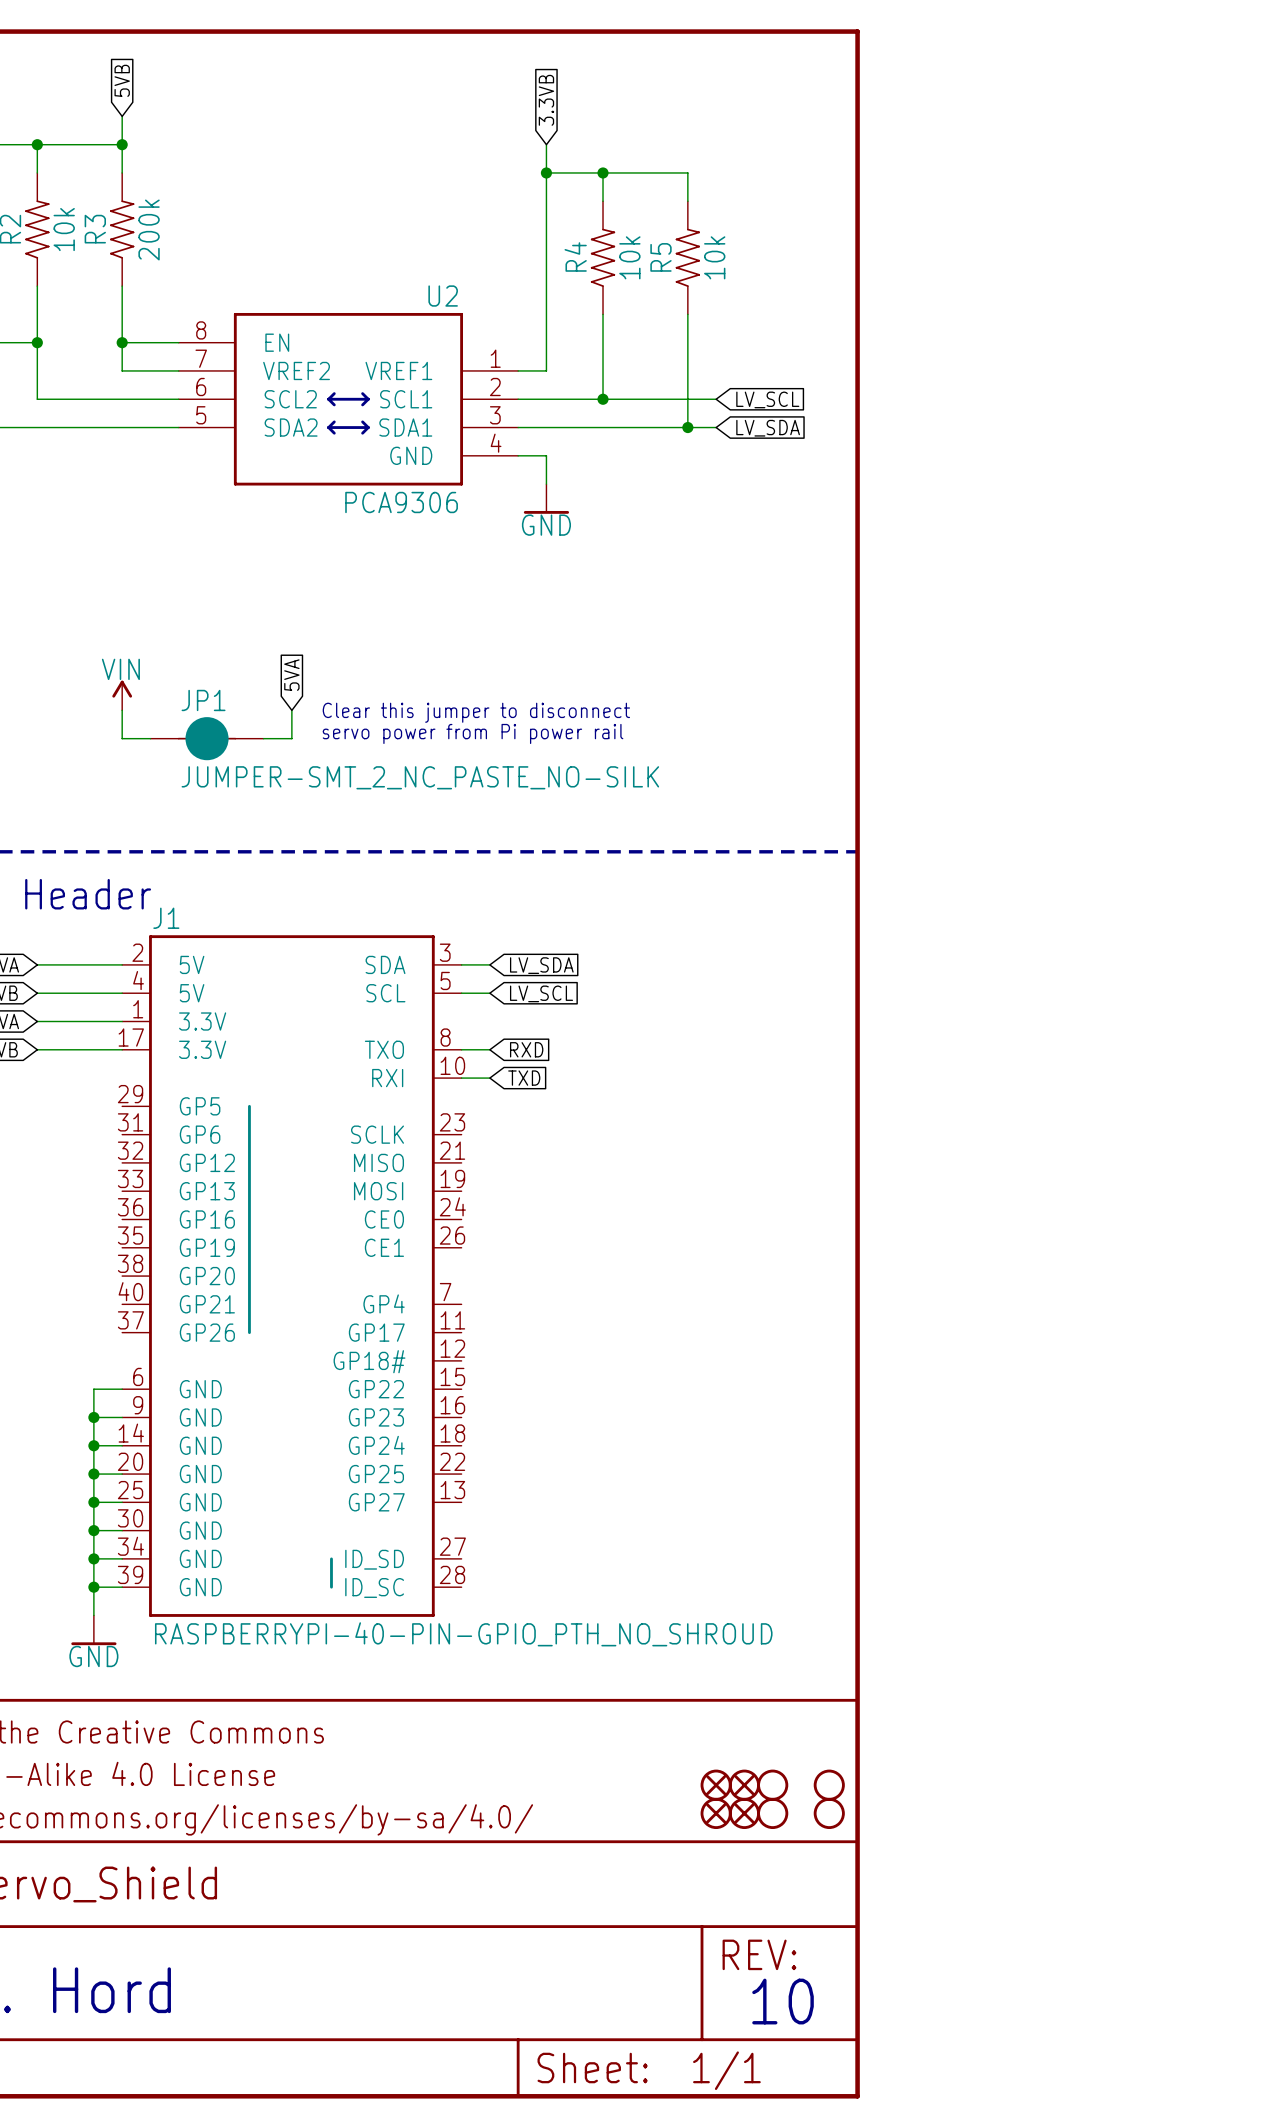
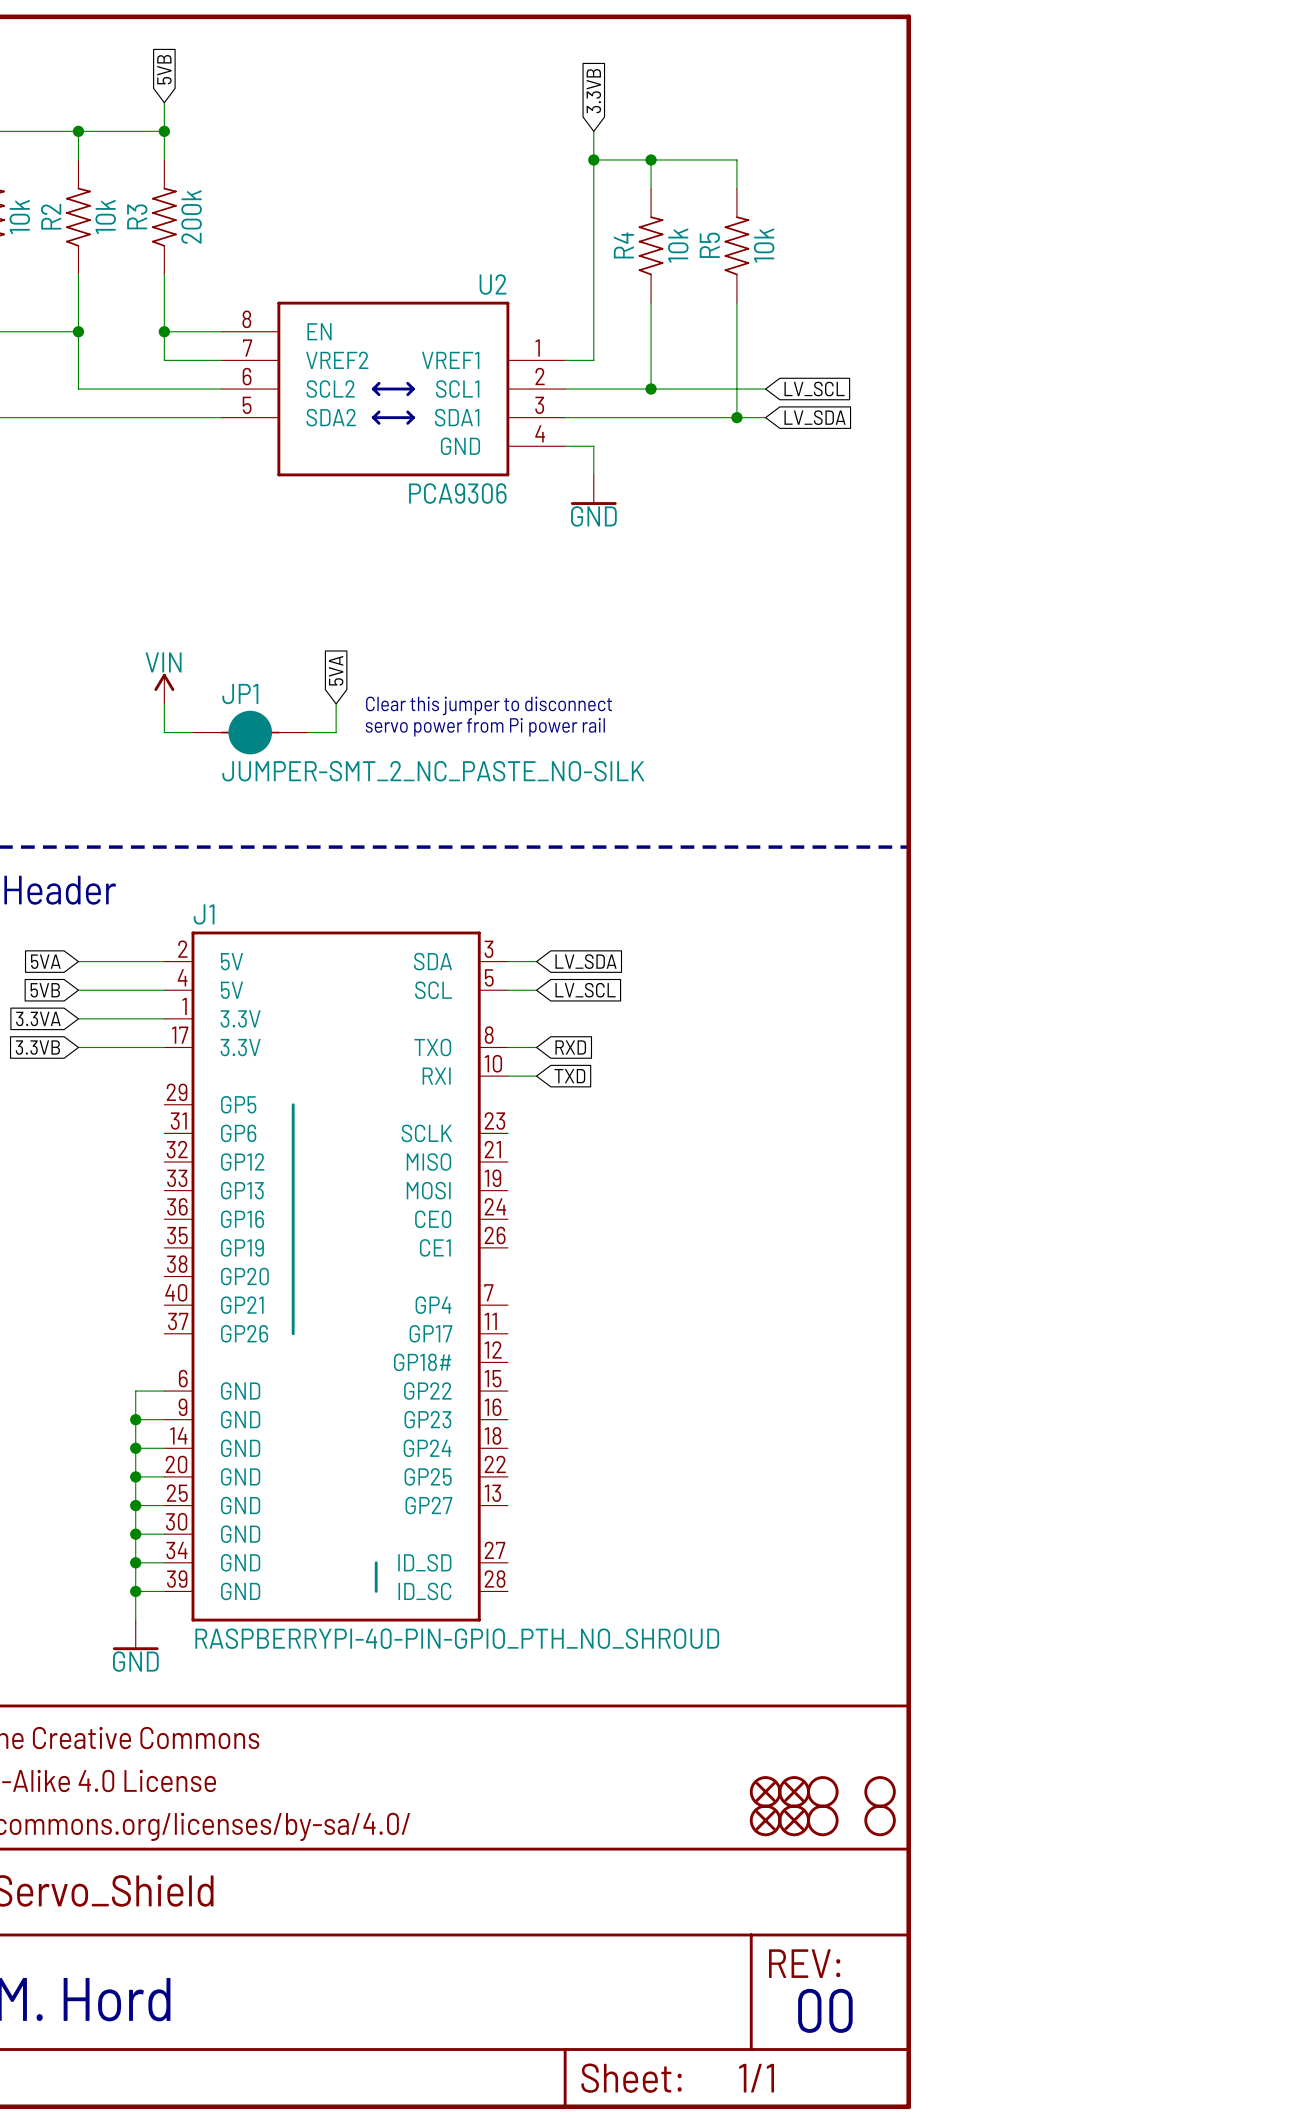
text: 10 (783, 2001) -> 00 (825, 2010)

